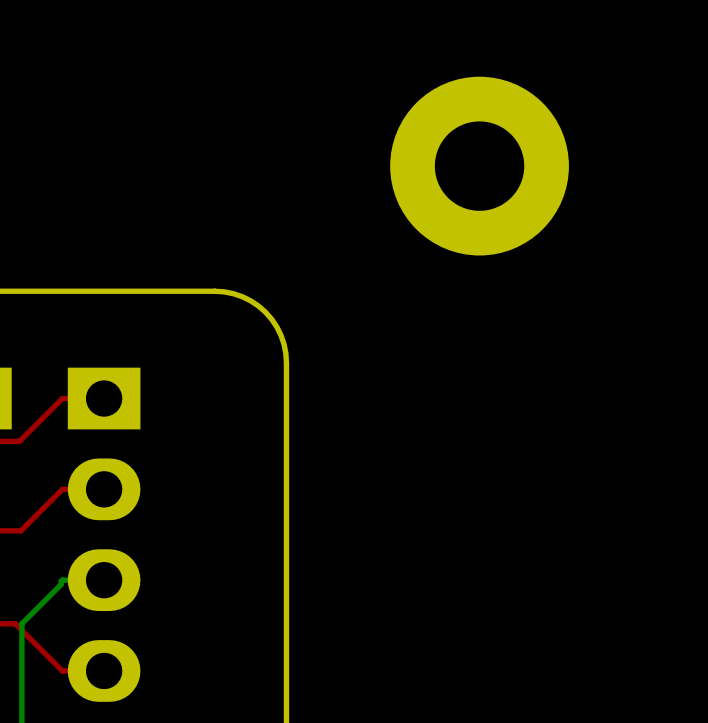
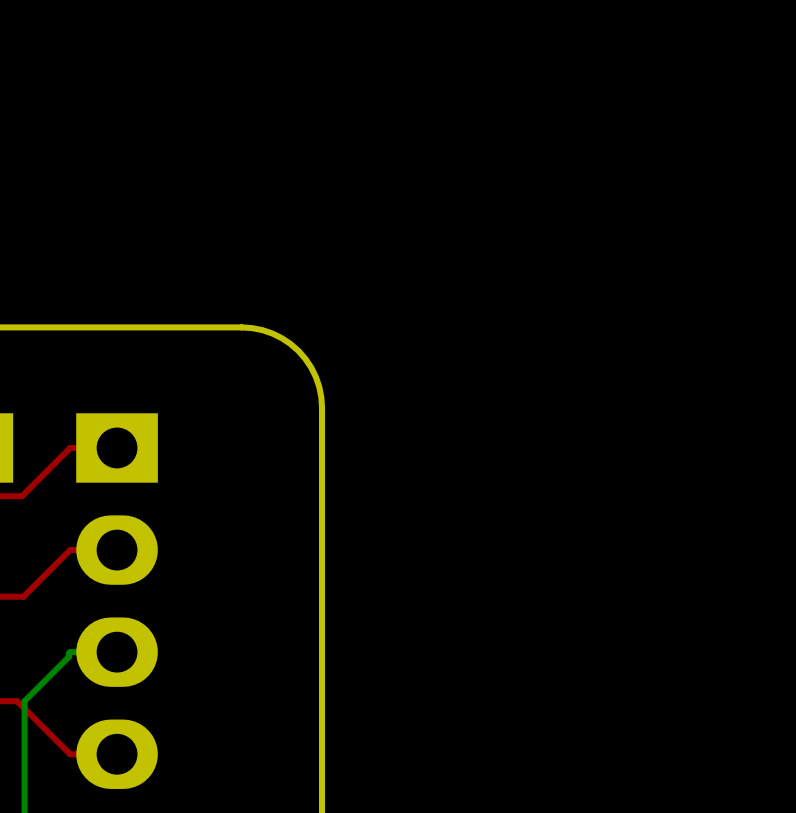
part: (479, 166) -> none

